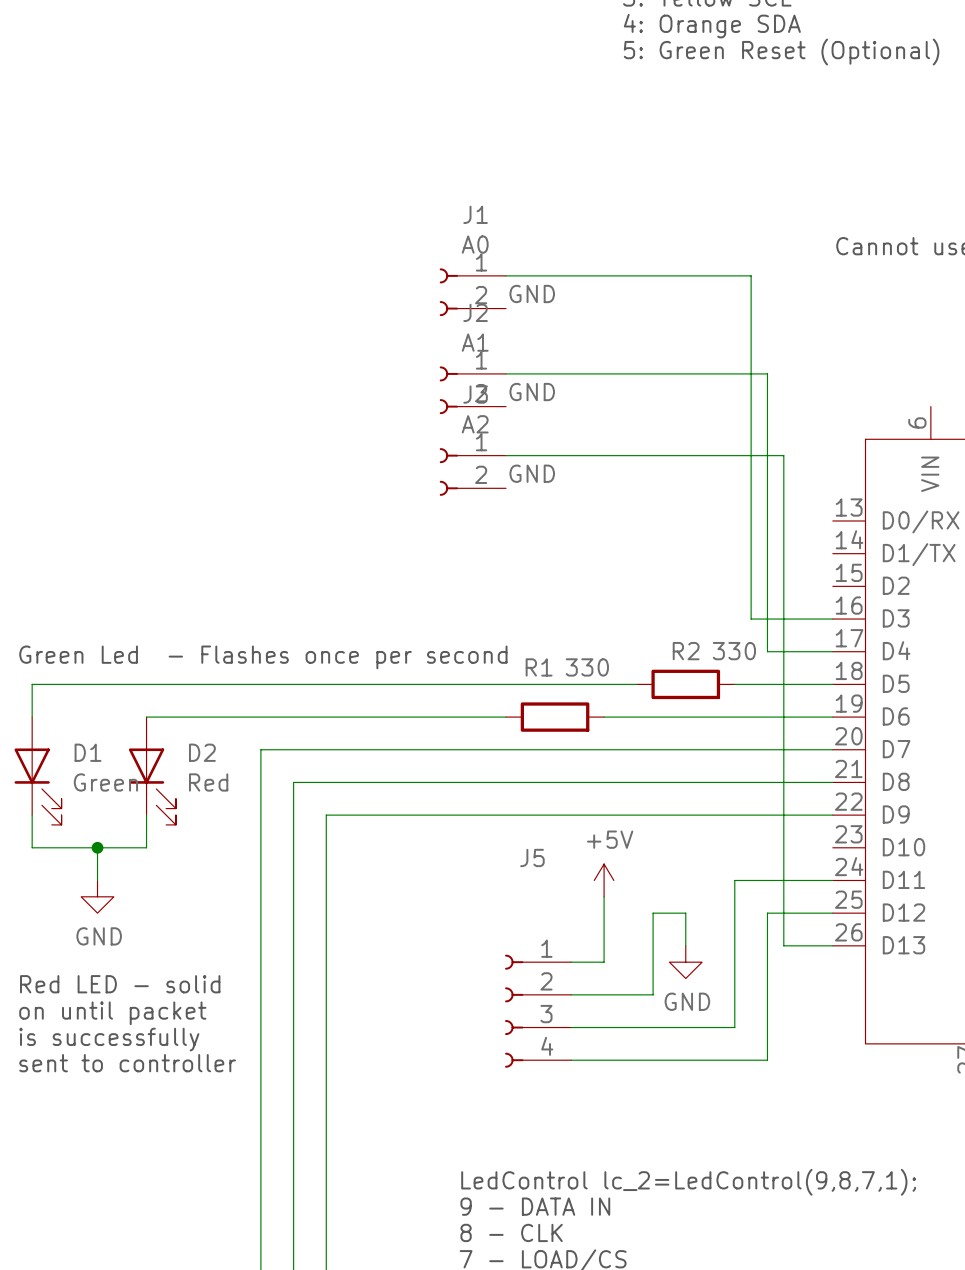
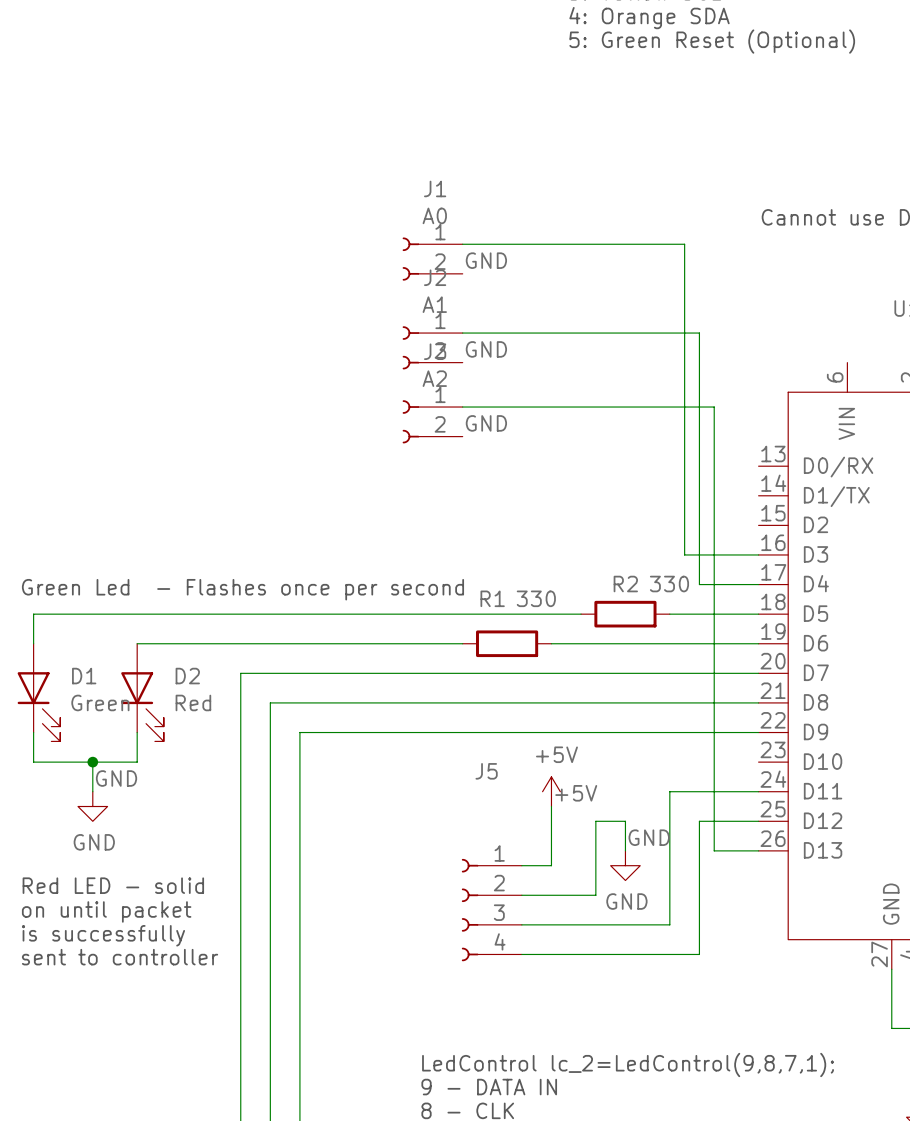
label: none -> GND (116, 778)
label: none -> +5V (576, 793)
label: none -> GND (649, 837)

